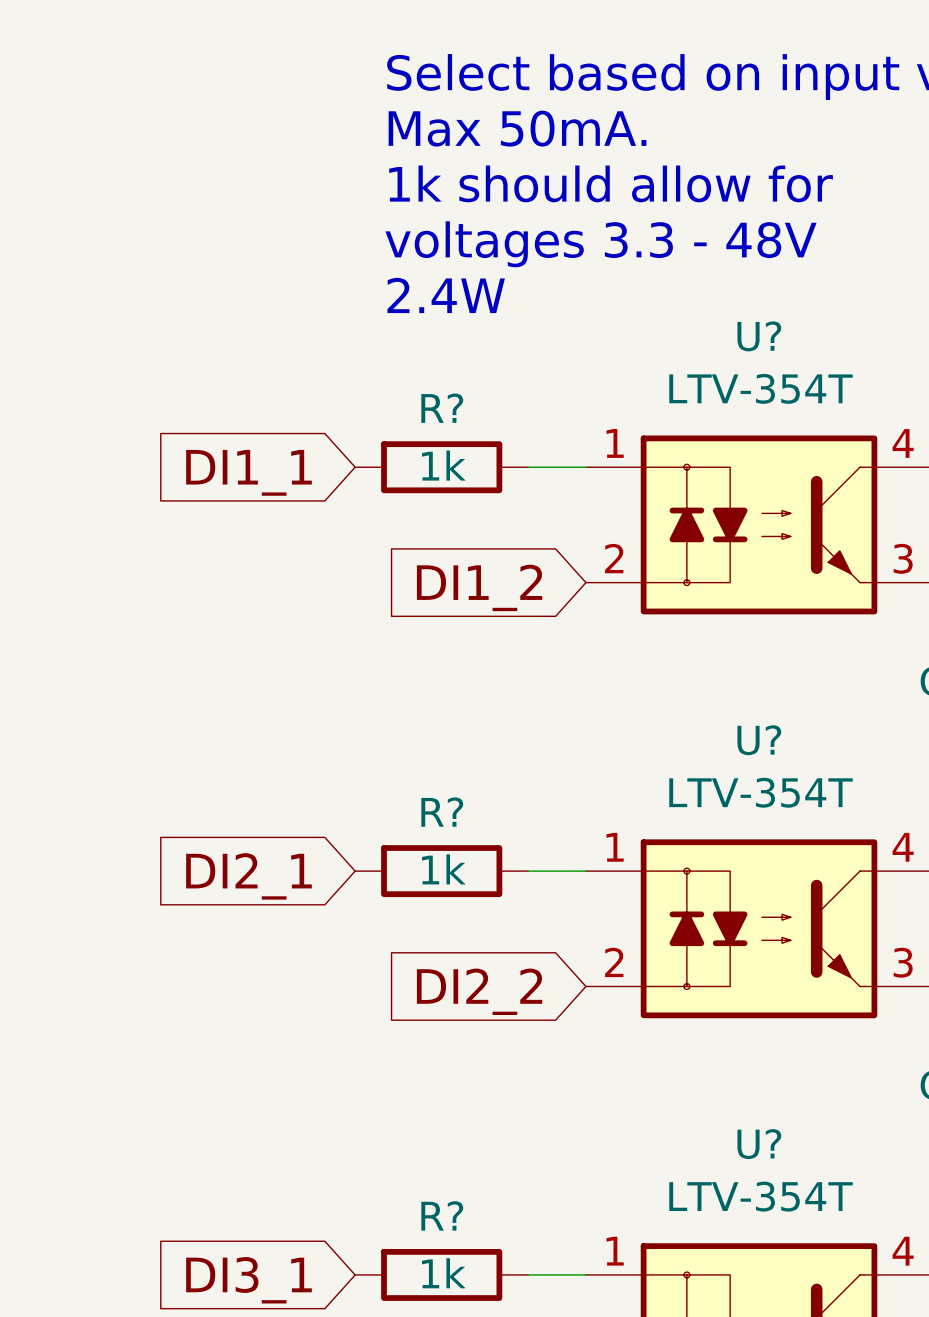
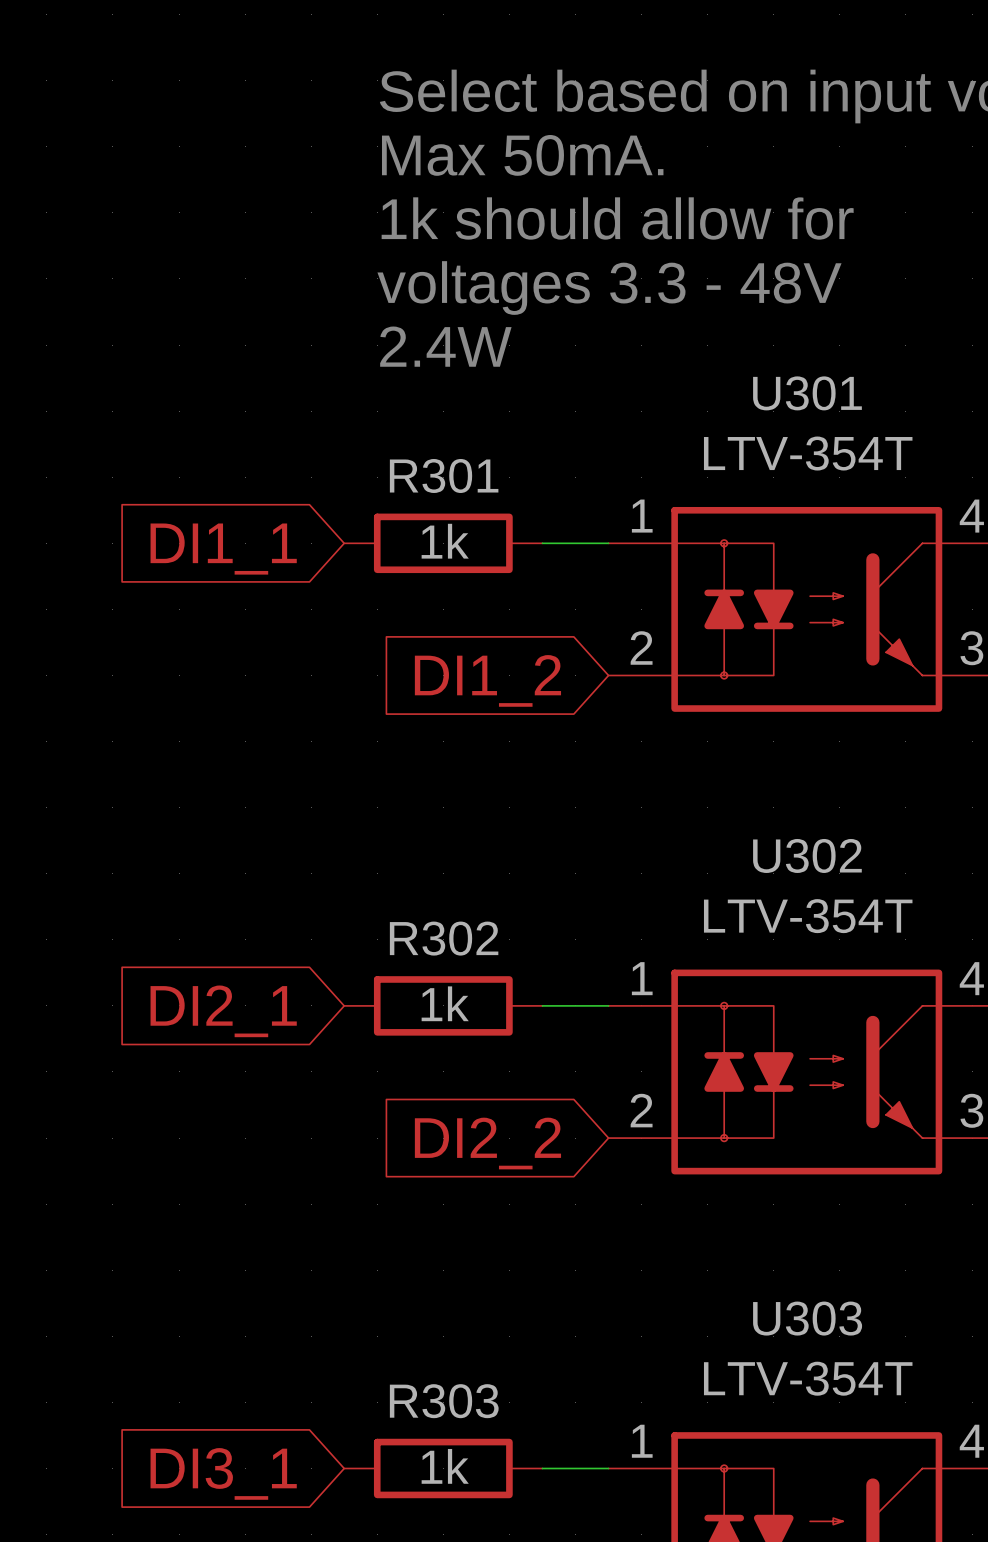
U? name: U? (759, 336) -> U301 (807, 393)
R? name: R? (442, 408) -> R301 (444, 475)
U? name: U? (759, 740) -> U302 (807, 855)
R? name: R? (442, 812) -> R302 (444, 938)
U? name: U? (759, 1144) -> U303 (807, 1318)
R? name: R? (442, 1215) -> R303 (444, 1401)

